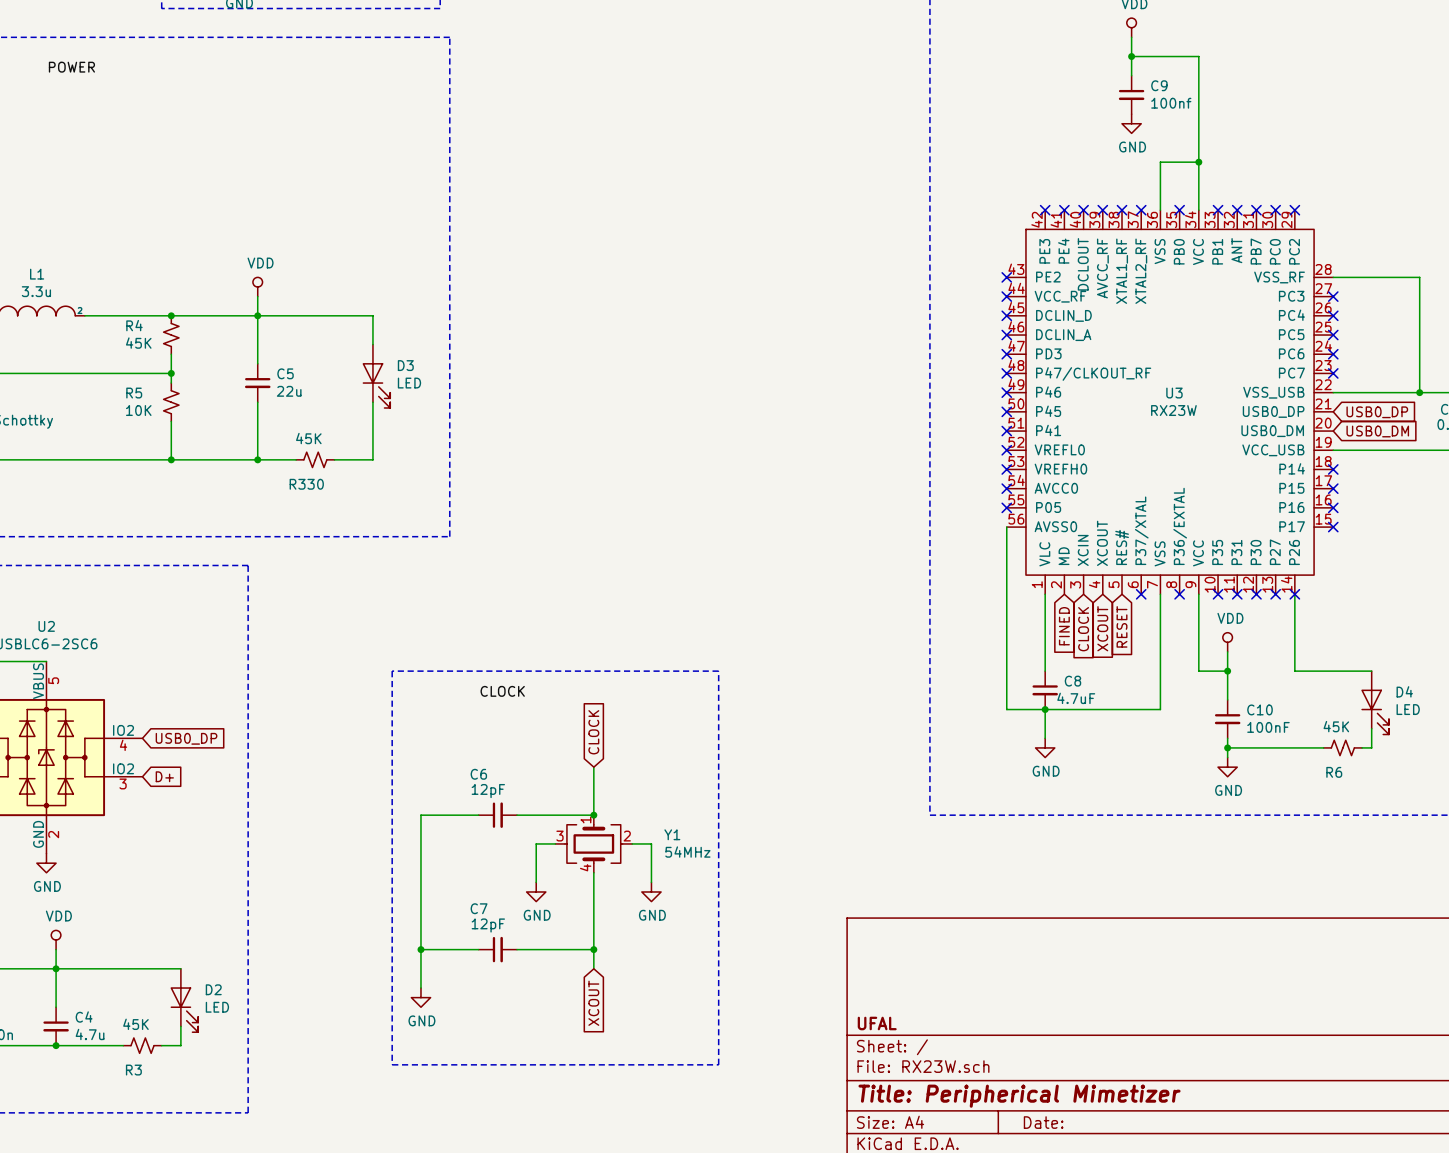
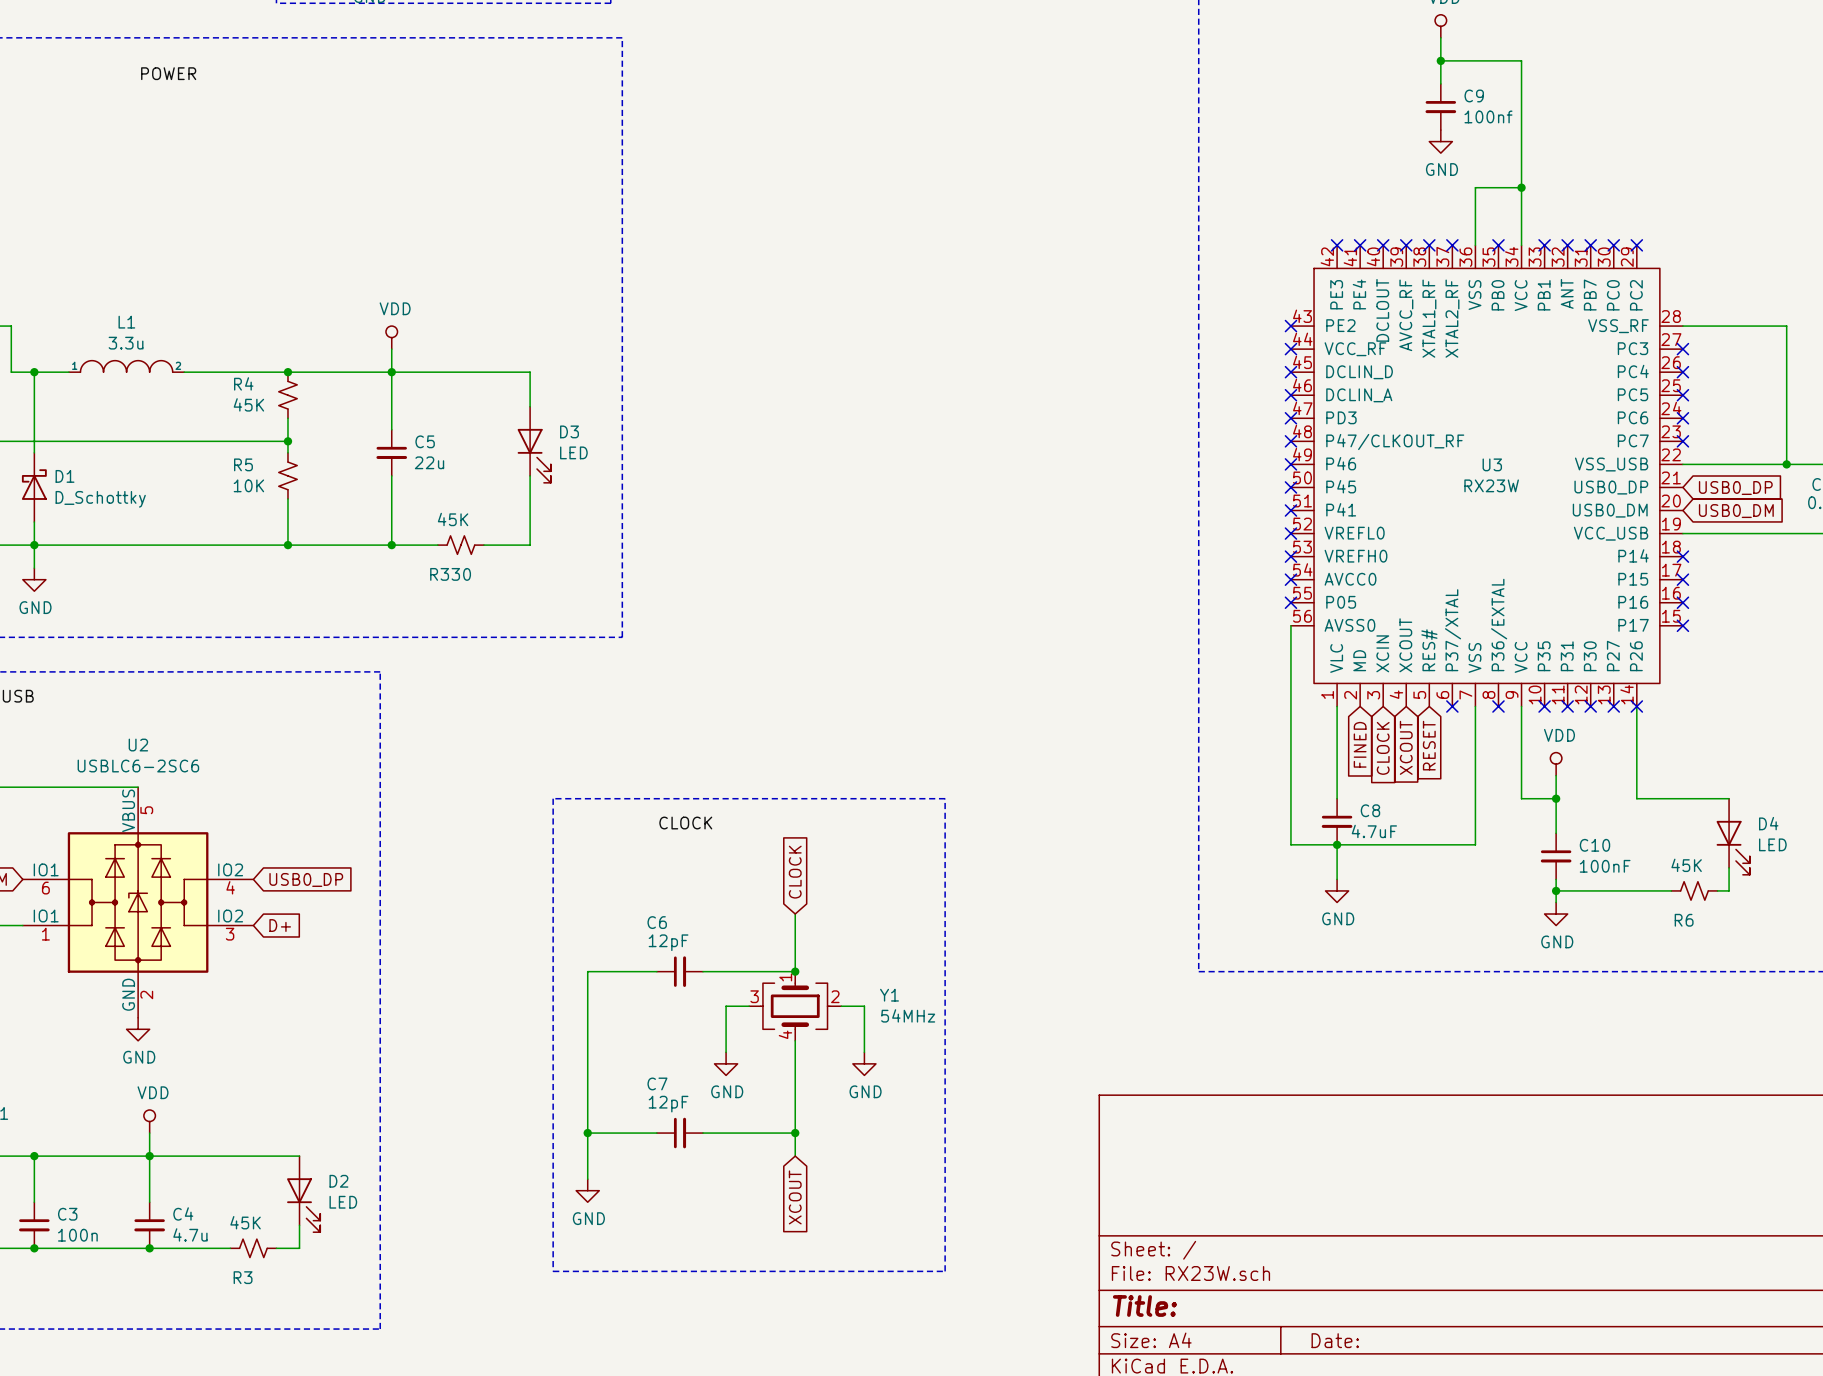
title block: UFAL (877, 1023) -> none
title block: Title: Peripherical Mimetizer (1019, 1096) -> Title: (1144, 1306)

